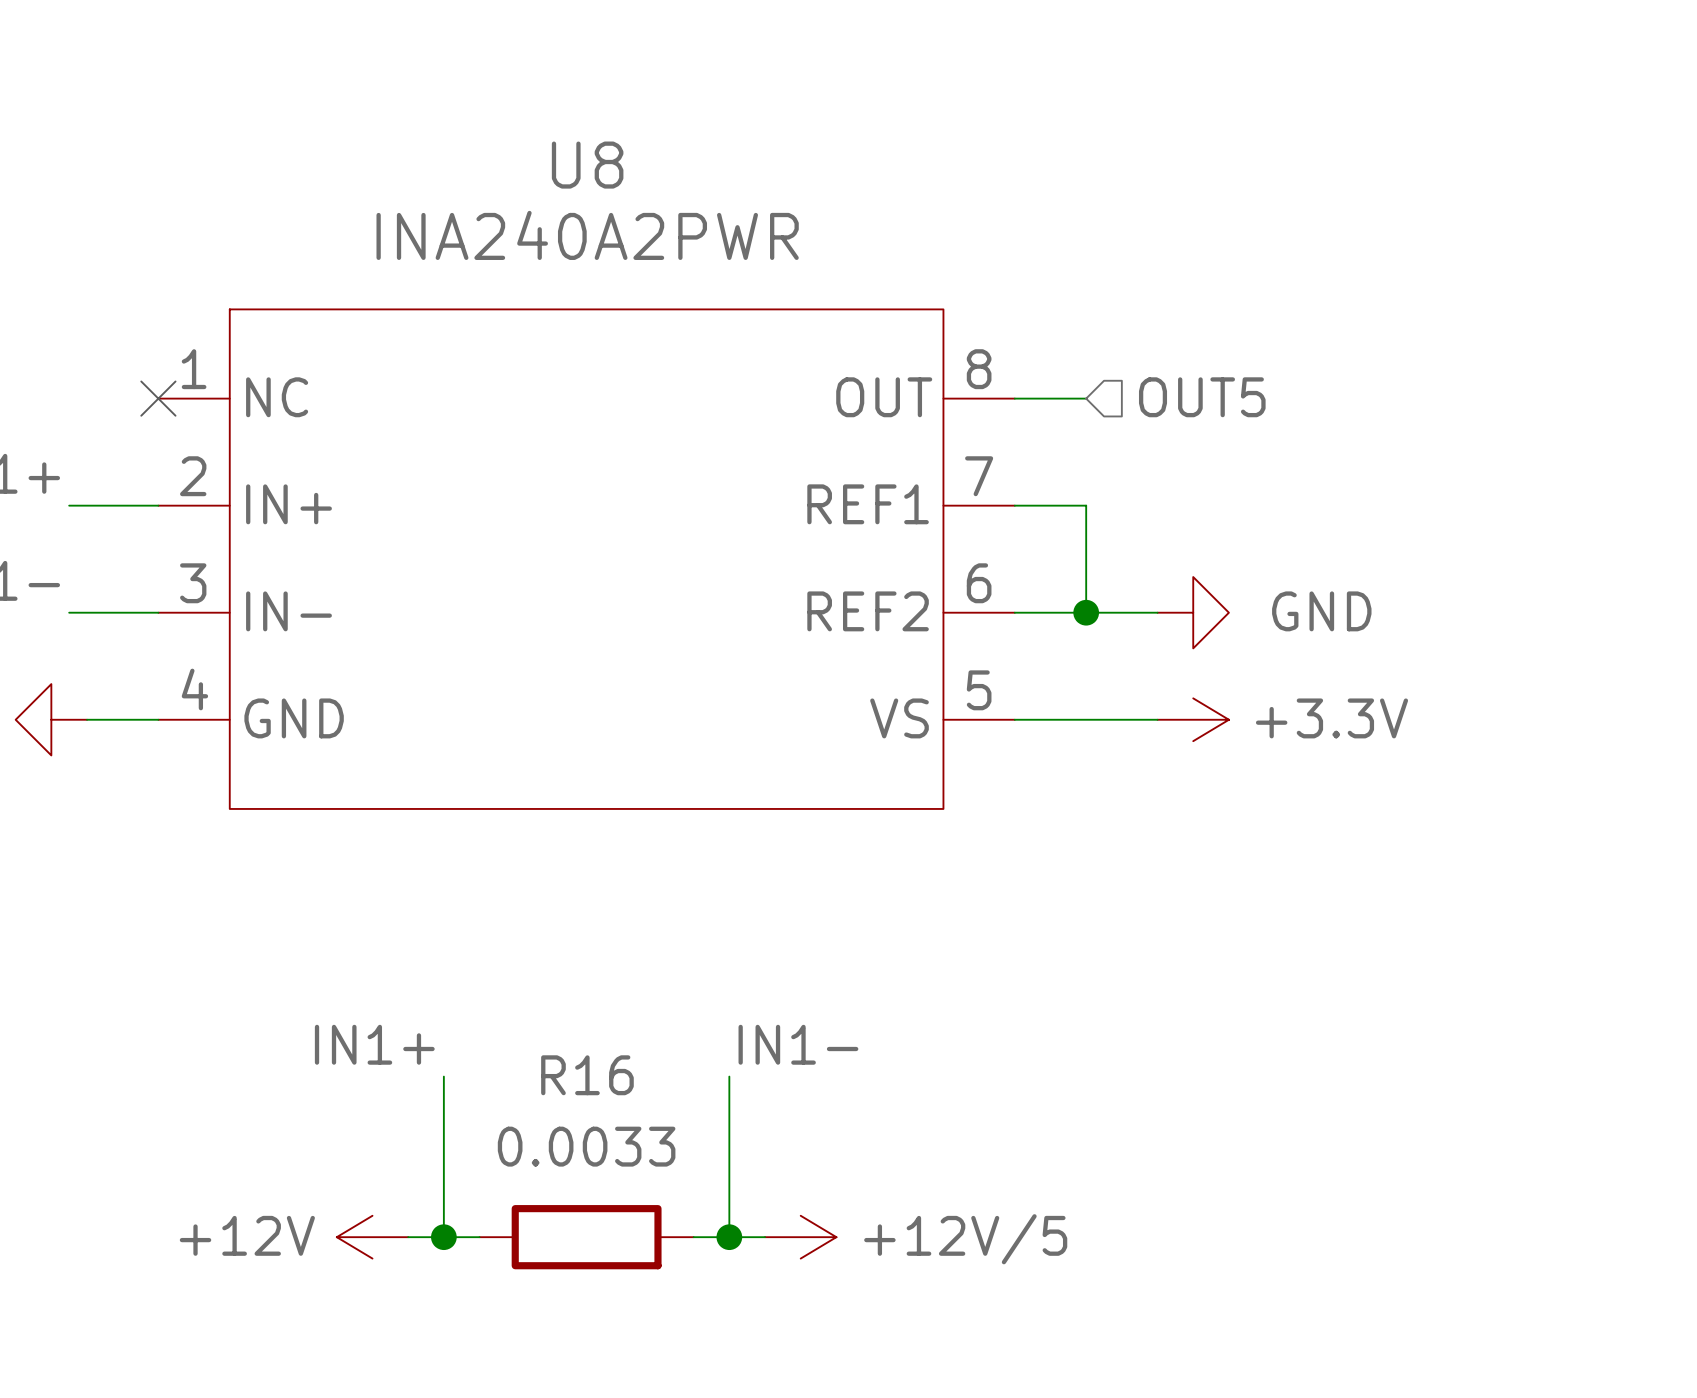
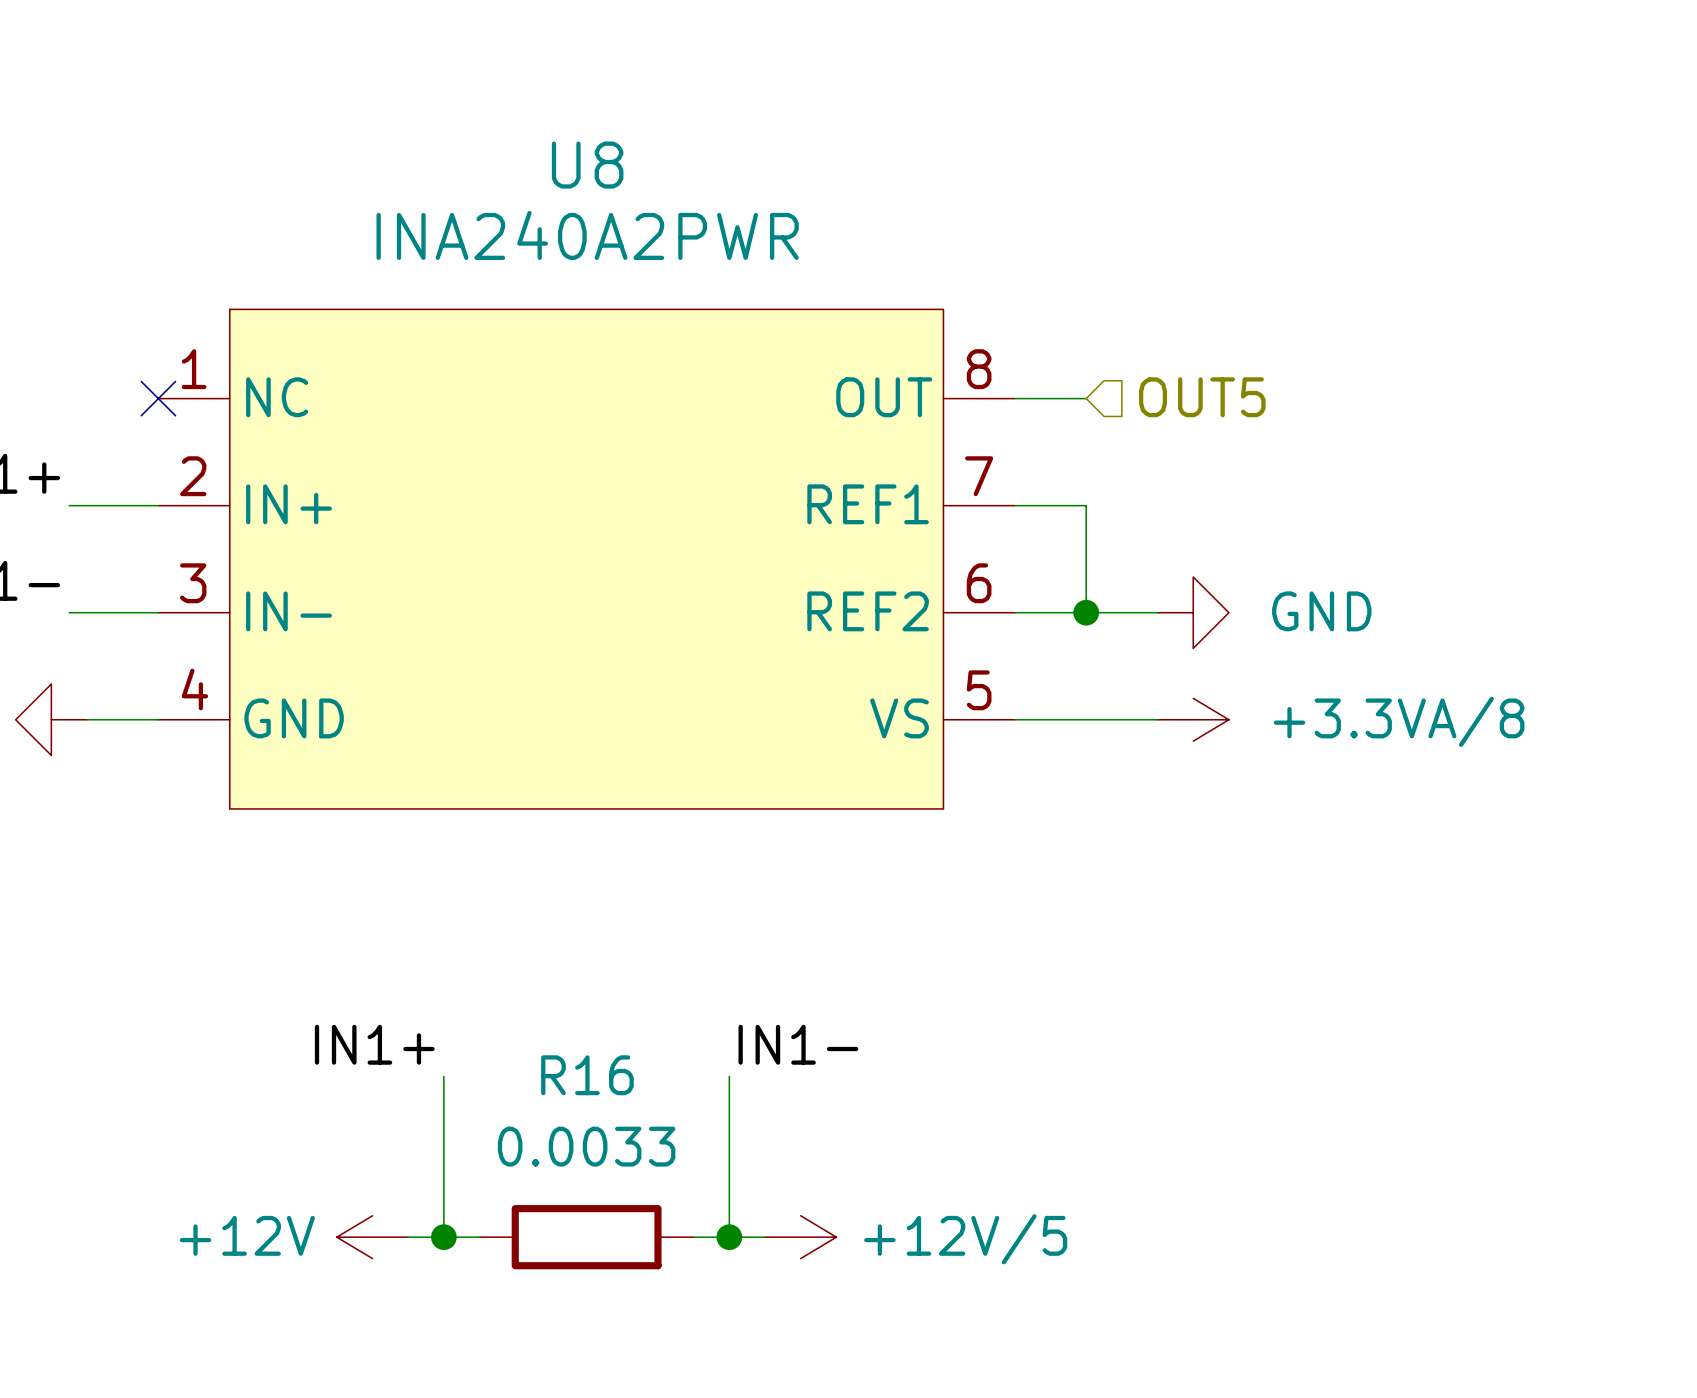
power symbol: +3.3V (1193, 719) -> +3.3VA/8 (1193, 719)

